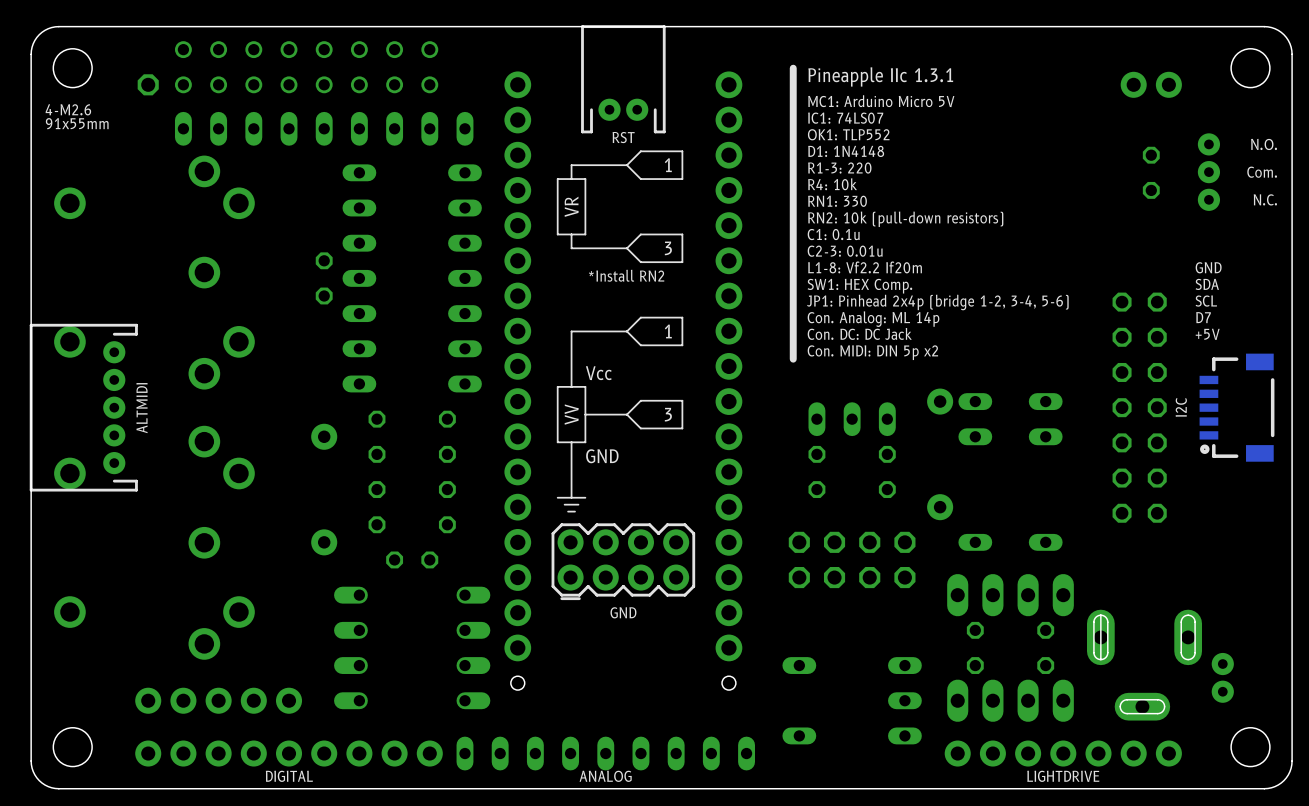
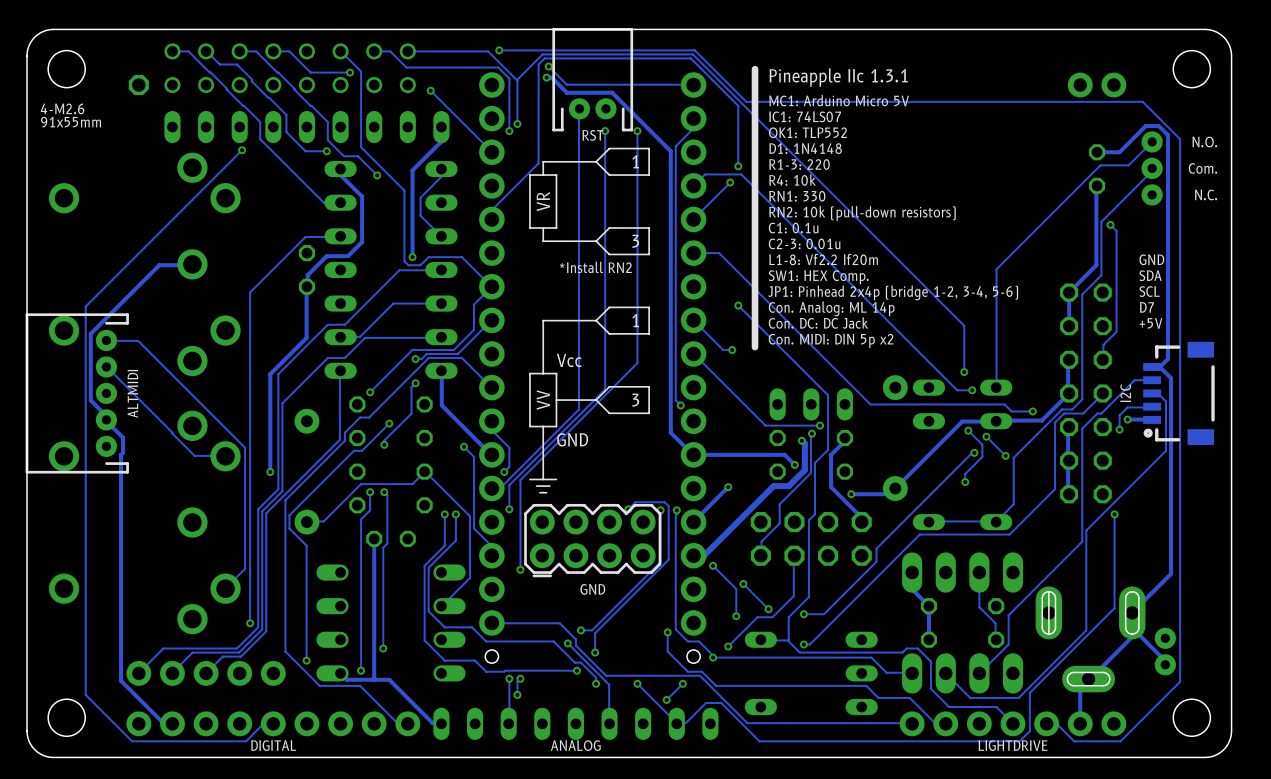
track: none -> (499, 50) (694, 50) (746, 101) (1142, 101) (1180, 139) (1180, 681) (1120, 741) (1074, 741) (1057, 724) (1046, 723)
via: none -> (499, 50)
track: none -> (172, 51) (188, 51) (210, 72) (260, 122) (260, 139) (323, 202) (340, 202)
track: none -> (206, 51) (219, 64) (237, 64) (252, 79) (286, 114) (286, 132) (305, 151) (326, 151)
track: none -> (239, 51) (256, 51) (327, 122) (327, 140) (343, 156) (358, 156) (377, 175)
track: none -> (273, 51) (289, 51) (310, 72) (349, 72)
track: none -> (340, 51) (361, 71) (361, 147) (404, 190) (404, 261) (408, 265) (420, 265) (428, 257) (461, 257) (491, 286) (474, 304) (474, 329) (453, 349) (412, 349) (370, 392)
track: none -> (374, 51) (390, 51) (406, 67) (498, 67) (509, 78) (509, 131)
track: none -> (407, 51) (488, 51) (517, 80) (517, 124)
track: none -> (548, 66) (566, 84) (693, 85)
via: none -> (548, 66)
via: none -> (349, 72)
track: none -> (546, 77) (551, 77) (566, 92) (612, 92) (670, 151) (670, 432) (693, 454) (784, 454) (794, 464)
via: none -> (546, 77)
track: none -> (516, 80) (542, 54) (692, 54) (964, 325) (964, 372)
track: none -> (430, 90) (491, 152)
via: none -> (430, 90)
track: none -> (579, 108) (578, 409) (500, 488) (491, 488)
track: none -> (693, 118) (692, 129) (675, 146) (675, 400) (680, 405)
via: none -> (517, 124)
track: none -> (441, 127) (440, 142) (412, 170) (412, 257)
via: none -> (509, 131)
track: none -> (605, 131) (605, 389) (509, 485) (509, 509)
via: none -> (605, 131)
track: none -> (637, 131) (637, 363) (520, 480) (520, 569)
via: none -> (637, 131)
track: none -> (1152, 141) (1128, 165) (1100, 165) (996, 269) (996, 387)
track: none -> (242, 150) (85, 306) (85, 694) (132, 741) (246, 741) (263, 724) (273, 723)
via: none -> (242, 150)
via: none -> (326, 151)
track: none -> (1097, 152) (1119, 152) (1145, 126) (1158, 126) (1168, 135) (1168, 359) (1160, 366) (1152, 366) (1159, 367) (1171, 378) (1171, 573) (1132, 612)
track: none -> (738, 166) (738, 105) (690, 58) (544, 58) (538, 64) (538, 163) (492, 209) (491, 219)
via: none -> (738, 166)
track: none -> (340, 169) (340, 175) (362, 196) (362, 242) (347, 256) (326, 256) (307, 275) (306, 337) (270, 374) (270, 472)
track: none -> (441, 169) (440, 177) (420, 197) (420, 215) (441, 236)
track: none -> (1152, 168) (1151, 171) (1101, 221) (1101, 275) (1082, 294) (1082, 399) (1072, 409) (1062, 409) (1013, 457) (1013, 504) (996, 522) (928, 522)
via: none -> (377, 175)
track: none -> (730, 182) (693, 219)
via: none -> (730, 182)
track: none -> (693, 185) (705, 174) (741, 174) (957, 390) (972, 390)
track: none -> (1097, 185) (1096, 265) (1069, 292)
track: none -> (1110, 224) (1116, 230) (1116, 331) (1103, 344) (1102, 359)
via: none -> (1110, 224)
track: none -> (340, 236) (305, 236) (250, 292) (250, 623)
track: none -> (693, 253) (719, 253) (870, 404) (1004, 404) (1011, 411) (1032, 411)
via: none -> (412, 257)
track: none -> (192, 264) (159, 265) (90, 333) (90, 400) (105, 415) (106, 421) (123, 437) (123, 452) (121, 454) (121, 680) (163, 723) (172, 723)
track: none -> (441, 269) (399, 270) (344, 324) (327, 324) (278, 374) (278, 489) (258, 509) (258, 627) (237, 648) (163, 648) (138, 673)
track: none -> (1069, 292) (1069, 326)
track: none -> (441, 303) (393, 303) (360, 336) (340, 337)
track: none -> (738, 305) (828, 395) (828, 449) (814, 462) (814, 514) (808, 520) (808, 597) (788, 617) (788, 640)
via: none -> (738, 305)
track: none -> (491, 320) (457, 353) (426, 353) (421, 359) (415, 359)
track: none -> (693, 320) (723, 349) (732, 349)
track: none -> (441, 337) (365, 337) (344, 358) (327, 358) (282, 403) (282, 491) (262, 511) (262, 629) (239, 652) (192, 652) (172, 673)
track: none -> (106, 340) (138, 340) (245, 447) (245, 568) (225, 588)
via: none -> (732, 349)
track: none -> (693, 353) (765, 425) (820, 425)
via: none -> (415, 359)
track: none -> (1069, 359) (1069, 393) (1041, 420) (962, 421) (889, 494) (851, 494)
track: none -> (106, 366) (194, 455) (225, 456)
track: none -> (340, 370) (339, 439) (266, 513) (266, 631) (241, 656) (222, 656) (206, 673)
track: none -> (441, 370) (441, 405) (491, 454)
via: none -> (964, 372)
track: none -> (1151, 380) (1134, 380) (1101, 413) (1097, 413) (1082, 428) (1082, 541) (1008, 615) (1008, 644) (979, 673)
track: none -> (415, 383) (411, 387) (411, 413) (384, 440) (384, 444)
via: none -> (415, 383)
track: none -> (491, 387) (461, 358) (428, 358) (369, 417) (360, 417) (344, 432) (344, 440) (285, 500) (285, 651) (319, 685) (360, 685) (397, 723) (407, 723)
via: none -> (972, 390)
via: none -> (370, 392)
track: none -> (1102, 393) (1083, 413) (1064, 413) (1055, 422) (1055, 489) (1009, 534) (919, 534) (809, 644) (803, 644)
track: none -> (1152, 393) (1158, 394) (1165, 401) (1165, 450) (1086, 530) (1086, 630) (1018, 697) (970, 697) (945, 673)
via: none -> (680, 405)
track: none -> (1152, 406) (1127, 407) (1119, 415) (1119, 429)
via: none -> (1032, 411)
track: none -> (1127, 419) (1152, 419)
via: none -> (1127, 419)
track: none -> (491, 421) (492, 430) (509, 447) (509, 466) (504, 472)
track: none -> (389, 423) (362, 450) (354, 450) (289, 515) (289, 528) (306, 545) (306, 660)
via: none -> (389, 423)
via: none -> (820, 425)
track: none -> (1069, 427) (1069, 494)
via: none -> (1119, 429)
track: none -> (968, 430) (982, 444) (982, 456) (965, 474) (965, 482)
via: none -> (968, 430)
track: none -> (811, 433) (810, 473) (779, 504) (779, 523) (761, 541) (760, 555)
via: none -> (811, 433)
track: none -> (986, 436) (1005, 455)
via: none -> (986, 436)
track: none -> (844, 438) (844, 441) (831, 454) (831, 487) (861, 517) (861, 522)
track: none -> (801, 440) (804, 443) (804, 469) (788, 486) (773, 486) (704, 555) (693, 555)
via: none -> (801, 440)
via: none -> (384, 444)
track: none -> (463, 446) (474, 456) (474, 528) (491, 545) (491, 555)
via: none -> (463, 446)
track: none -> (974, 452) (876, 548) (876, 561) (824, 614) (803, 614)
via: none -> (974, 452)
via: none -> (1005, 455)
via: none -> (794, 464)
via: none -> (270, 472)
via: none -> (504, 472)
via: none -> (965, 482)
track: none -> (728, 487) (693, 522)
via: none -> (728, 487)
track: none -> (370, 492) (370, 510) (361, 519) (361, 670)
via: none -> (370, 492)
track: none -> (384, 492) (387, 495) (387, 543) (383, 547) (383, 648)
via: none -> (384, 492)
via: none -> (851, 494)
via: none -> (509, 509)
track: none -> (628, 509) (635, 502) (664, 502) (668, 506) (668, 559) (595, 633) (595, 652)
via: none -> (628, 509)
track: none -> (660, 510) (660, 561) (592, 630) (580, 630)
via: none -> (660, 510)
track: none -> (676, 510) (675, 629) (687, 641) (698, 641) (715, 657)
via: none -> (676, 510)
track: none -> (444, 514) (444, 545) (424, 565) (424, 640) (444, 660) (475, 660) (486, 671) (576, 670)
via: none -> (444, 514)
track: none -> (455, 514) (455, 540) (428, 567) (428, 611) (444, 627) (472, 627) (486, 641) (553, 641) (574, 662) (580, 662) (596, 677) (596, 683)
via: none -> (455, 514)
track: none -> (1114, 514) (1114, 608) (1029, 692) (1029, 731) (1019, 741) (759, 741) (721, 702) (706, 702) (685, 723) (676, 723)
via: none -> (1114, 514)
track: none -> (306, 522) (323, 521) (361, 484) (412, 484) (424, 471) (470, 516) (470, 577) (441, 606)
track: none -> (374, 538) (374, 679)
track: none -> (794, 555) (793, 596) (772, 617) (757, 617) (728, 646)
track: none -> (713, 565) (736, 589) (736, 616)
via: none -> (713, 565)
via: none -> (520, 569)
track: none -> (912, 572) (912, 590) (928, 606) (928, 639)
track: none -> (979, 572) (979, 607) (995, 623) (996, 639)
track: none -> (743, 583) (768, 609)
via: none -> (743, 583)
via: none -> (768, 609)
track: none -> (1132, 612) (1133, 629) (1164, 660) (1165, 664)
track: none -> (1132, 612) (1135, 633) (1080, 687) (1080, 723)
via: none -> (803, 614)
via: none -> (736, 616)
track: none -> (491, 622) (559, 623) (575, 639) (575, 645) (606, 675) (699, 675) (747, 723) (912, 723)
via: none -> (250, 623)
via: none -> (580, 630)
track: none -> (667, 632) (667, 651) (687, 671) (702, 671) (716, 685) (866, 685) (878, 697) (909, 697) (935, 723) (945, 723)
via: none -> (667, 632)
track: none -> (760, 639) (787, 640) (799, 652) (902, 652) (906, 648) (917, 648) (930, 661) (930, 688) (949, 707) (996, 707) (1013, 723)
track: none -> (567, 643) (609, 684) (609, 723)
via: none -> (567, 643)
via: none -> (803, 644)
via: none -> (728, 646)
via: none -> (383, 648)
via: none -> (595, 652)
track: none -> (713, 657) (871, 657) (886, 672) (912, 673)
via: none -> (713, 657)
via: none -> (306, 660)
via: none -> (361, 670)
via: none -> (576, 670)
track: none -> (340, 673) (346, 679) (389, 679) (432, 723) (441, 723)
track: none -> (509, 678) (508, 723)
via: none -> (509, 678)
track: none -> (520, 678) (517, 681) (517, 694)
via: none -> (520, 678)
via: none -> (596, 683)
track: none -> (637, 683) (676, 723)
via: none -> (637, 683)
track: none -> (682, 683) (666, 699)
via: none -> (682, 683)
via: none -> (517, 694)
via: none -> (666, 699)

